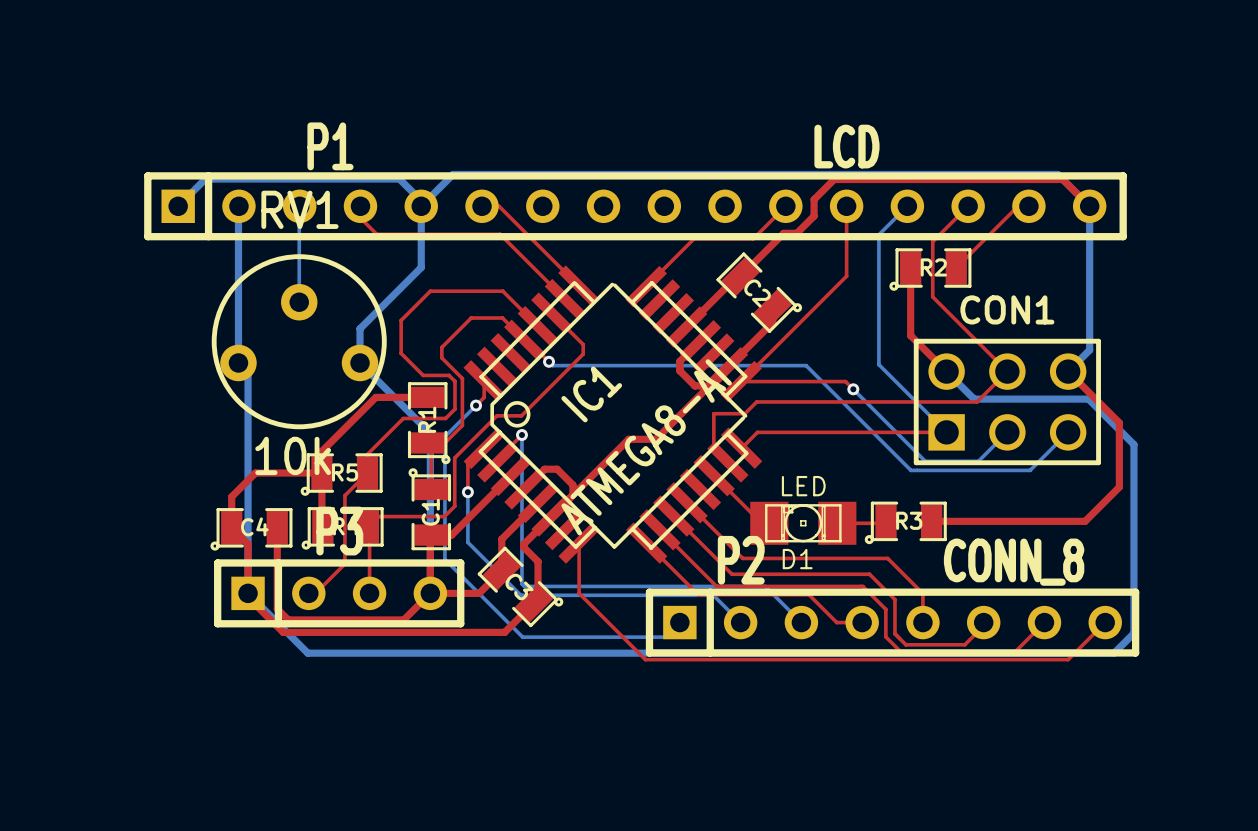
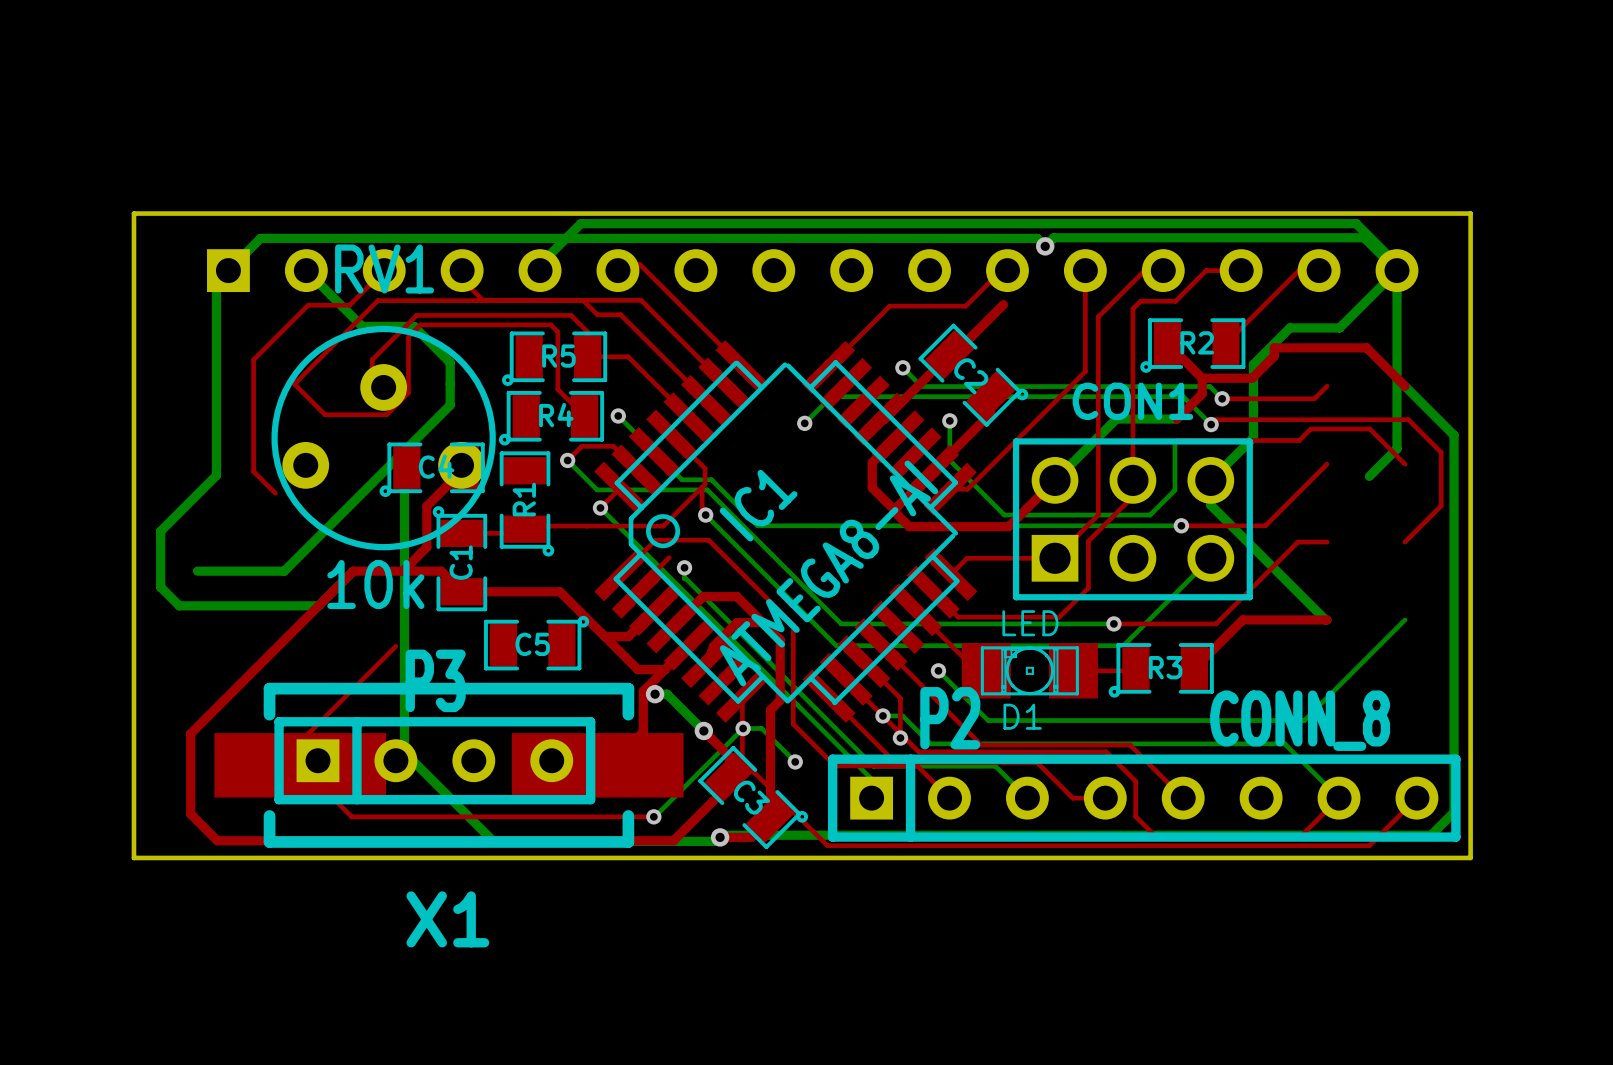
board edge: none -> (133, 213) (133, 857) (1470, 857) (1470, 213) (133, 213)
via: none -> (1045, 246)
bottom track: (178, 206) (205, 179) (399, 179) (421, 200) (421, 267) (360, 328) (360, 362) (430, 433) (430, 593) -> none
bottom track: (238, 206) (238, 362) (248, 372) (248, 593) (307, 653) (1114, 653) (1133, 633) (1133, 444) (1088, 399) (974, 399) (946, 371) -> none
bottom track: (299, 206) (299, 302) -> none
P1 side: top (635, 206) -> bottom (812, 270)
bottom track: (907, 206) (878, 234) (878, 364) (946, 432) -> none
top track: (968, 206) (932, 241) (932, 296) (1007, 371) (977, 401) (756, 401) (744, 413) (713, 413) (713, 447) (727, 461) -> (1241, 270) (1206, 270) (1175, 301) (1140, 301) (1132, 308) (1132, 496) (1088, 541) (1088, 588) (1059, 617) (958, 617) (933, 592)
top track: (1089, 206) (1062, 179) (834, 179) (814, 199) (814, 216) (796, 233) (783, 233) (686, 327) -> (1003, 304) (953, 354) (949, 354) (884, 419) (880, 419)
bottom track: none -> (228, 270) (260, 238) (1037, 238) (1045, 246) (1053, 237) (1364, 237) (1397, 270) (1339, 327) (1289, 327) (1253, 364) (1253, 437) (1210, 480) (1210, 505) (1327, 619)
bottom track: none -> (306, 270) (362, 326) (414, 326) (450, 362) (450, 405) (284, 571) (197, 571)
top track: none -> (384, 270) (349, 305) (308, 305) (253, 359) (253, 471) (275, 493)
bottom track: none -> (216, 282) (216, 475) (160, 531) (160, 587) (179, 605) (318, 605) (353, 571)
top track: (910, 268) (910, 335) (946, 371) -> (1167, 343) (1202, 378)
top track: (846, 276) (741, 381) -> (1085, 354) (1085, 371) (967, 489)
bottom track: none -> (902, 367) (921, 386) (1209, 386) (1222, 398)
via: none -> (902, 367)
top track: (502, 291) (430, 291) (401, 320) (401, 353) (423, 375) (449, 375) (454, 381) (454, 409) (445, 418) (403, 418) (367, 454) (367, 473) (344, 495) (344, 563) (315, 593) (308, 593) -> (644, 373) (628, 356) (587, 356) (587, 332) (571, 315) (416, 315) (372, 359) (372, 384)
top track: none -> (1202, 378) (1202, 393) (1177, 419)
top track: none -> (1202, 378) (1252, 378) (1274, 356) (1274, 347) (1366, 347) (1404, 386)
top track: none -> (1327, 386) (1314, 398) (1222, 398)
bottom track: none -> (1404, 386) (1454, 435) (1454, 812) (1431, 835) (722, 835) (716, 841) (493, 841) (404, 752) (404, 450)
via: none -> (1222, 398)
top track: (551, 313) (583, 344) (583, 354) (521, 415) (496, 415) (454, 457) (454, 506) (444, 516) (378, 516) (368, 526) (369, 593) -> (707, 401) (620, 314) (597, 314) (583, 300) (377, 300) (294, 384) (325, 414) (386, 414) (408, 392) (408, 336) (420, 324) (550, 324) (557, 331) (557, 389) (584, 416)
bottom track: none -> (618, 415) (682, 479) (711, 479) (757, 525) (1181, 525)
via: none -> (618, 415)
bottom track: none -> (1177, 419) (1116, 419) (1055, 480)
top track: none -> (1214, 419) (1408, 419) (1441, 452) (1441, 505) (1404, 542)
bottom track: none -> (949, 420) (949, 460) (1004, 515) (1150, 515) (1174, 490) (1174, 442)
via: none -> (949, 420)
bottom track: none -> (804, 423) (831, 396) (1183, 396) (1211, 424)
via: none -> (804, 423)
via: none -> (1211, 424)
top track: none -> (672, 436) (705, 468) (705, 484) (663, 526) (528, 526) (520, 533) (461, 533)
top track: none -> (1174, 442) (1177, 440) (1299, 440) (1310, 429) (1369, 429) (1404, 464)
top track: none -> (567, 460) (581, 446) (613, 446) (638, 470)
bottom track: none -> (567, 460) (597, 489) (707, 489) (841, 623) (1113, 623)
via: none -> (567, 460)
top track: (680, 360) (679, 370) (694, 385) (709, 385) -> (872, 462) (872, 487) (909, 526) (1008, 526) (1055, 480)
top track: (549, 361) (502, 318) (471, 318) (441, 347) (441, 357) (462, 378) (462, 425) (444, 442) (427, 442) (431, 446) (431, 489) -> none
bottom track: (549, 361) (552, 365) (806, 365) (910, 470) (1030, 470) (1068, 432) -> none
via: (549, 361) -> none
top track: none -> (1327, 464) (1265, 525) (1181, 525)
top track: none -> (465, 467) (426, 506) (426, 547) (402, 571)
top track: (1068, 371) (1119, 422) (1119, 487) (1085, 521) (931, 521) -> (1327, 619) (1242, 619) (1194, 668)
top track: (484, 380) (484, 397) (476, 405) -> (620, 488) (600, 507)
top track: none -> (702, 487) (702, 511) (705, 515)
top track: (754, 381) (845, 381) (853, 389) -> none
bottom track: (853, 389) (925, 461) (978, 461) (1007, 432) -> none
via: (853, 389) -> none
top track: (427, 397) (375, 397) (321, 451) (322, 526) -> none
top track: (697, 397) (655, 439) (628, 439) (523, 544) (523, 547) (538, 561) (538, 599) (504, 632) (283, 632) (248, 597) (248, 544) (231, 527) (231, 496) (255, 473) (321, 473) -> none
bottom track: none -> (705, 515) (836, 645) (1123, 645) (1210, 558)
via: none -> (705, 515)
CON1 position: (1007, 401) -> (1132, 519)
bottom track: (476, 405) (444, 436) (444, 559) (522, 637) (665, 637) (679, 622) -> (600, 507) (871, 779) (871, 798)
via position: (476, 405) -> (600, 507)
via: none -> (1181, 525)
top track: none -> (1327, 542) (1297, 542) (1216, 623) (1113, 623)
R1 position: (429, 423) -> (526, 503)
top track: (946, 432) (757, 432) (754, 435) -> (1144, 270) (1098, 316) (1098, 515) (1055, 558) (967, 558)
bottom track: (521, 435) (521, 584) (524, 586) (765, 586) (776, 597) -> (684, 567) (684, 578) (873, 766) (995, 766)
via position: (521, 435) -> (684, 567)
top track: (484, 448) (467, 464) (467, 492) -> (620, 574) (655, 540) (708, 540) (793, 624) (793, 724) (835, 765) (917, 765) (949, 798)
top track: (544, 469) (557, 469) (572, 485) (572, 495) -> (698, 601) (703, 596) (736, 596) (780, 639) (780, 700) (770, 710) (770, 818) (751, 837) (720, 837)
R5 position: (341, 474) -> (554, 358)
bottom track: none -> (1404, 619) (1304, 720) (988, 720) (938, 670)
top track: none -> (763, 622) (736, 622) (713, 646) (707, 661)
via: none -> (1113, 623)
bottom track: (467, 492) (467, 542) (520, 595) (713, 595) (740, 622) -> none
via: (467, 492) -> none
top track: (490, 496) (451, 535) (430, 536) (430, 593) (403, 619) (288, 619) (277, 608) (277, 527) -> (628, 636) (604, 636)
C5: none -> (536, 643)
top track: none -> (395, 646) (300, 741) (300, 765) (351, 816) (653, 816)
C1 position: (429, 509) -> (459, 558)
top track: none -> (664, 669) (637, 669) (560, 591) (461, 591) (441, 571) (353, 571) (190, 733) (190, 814) (217, 840) (673, 840) (729, 785) (729, 756) (703, 730)
via: none -> (938, 670)
R4 position: (342, 528) -> (551, 418)
C4 position: (251, 529) -> (432, 469)
bottom track: none -> (655, 694) (667, 694) (703, 730)
via: none -> (655, 694)
top track: (702, 544) (731, 574) (869, 574) (894, 599) (894, 633) (905, 644) (964, 644) (983, 625) (983, 622) -> (900, 698) (900, 738)
bottom track: none -> (882, 715) (902, 715) (930, 743)
via: none -> (882, 715)
top track: (742, 558) (887, 558) (922, 593) (922, 622) -> (952, 715) (981, 745) (1130, 745) (1183, 798)
via: none -> (743, 728)
via: none -> (703, 730)
via: none -> (900, 738)
bottom track: none -> (930, 743) (1284, 743) (1339, 798)
C3 position: (520, 586) -> (753, 797)
bottom track: none -> (795, 761) (761, 728) (743, 728) (653, 816)
via: none -> (795, 761)
X1: none -> (448, 765)
via: none -> (653, 816)
via: none -> (720, 837)

